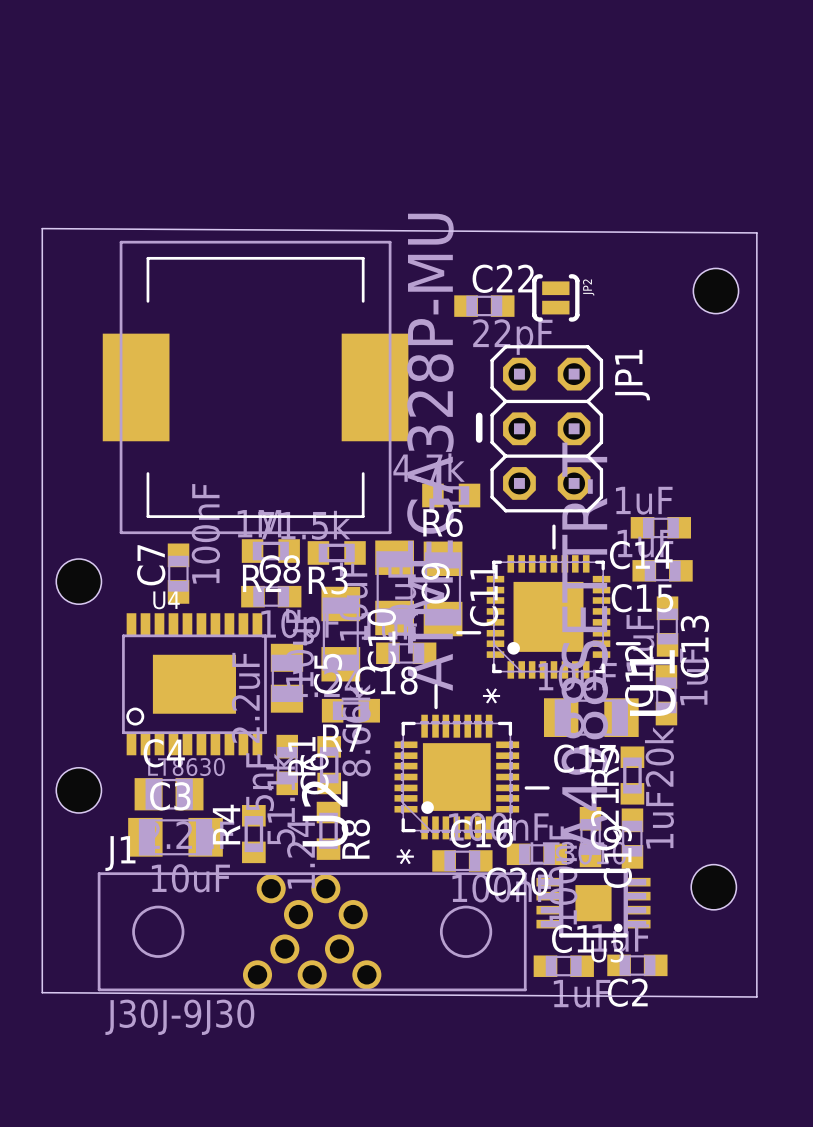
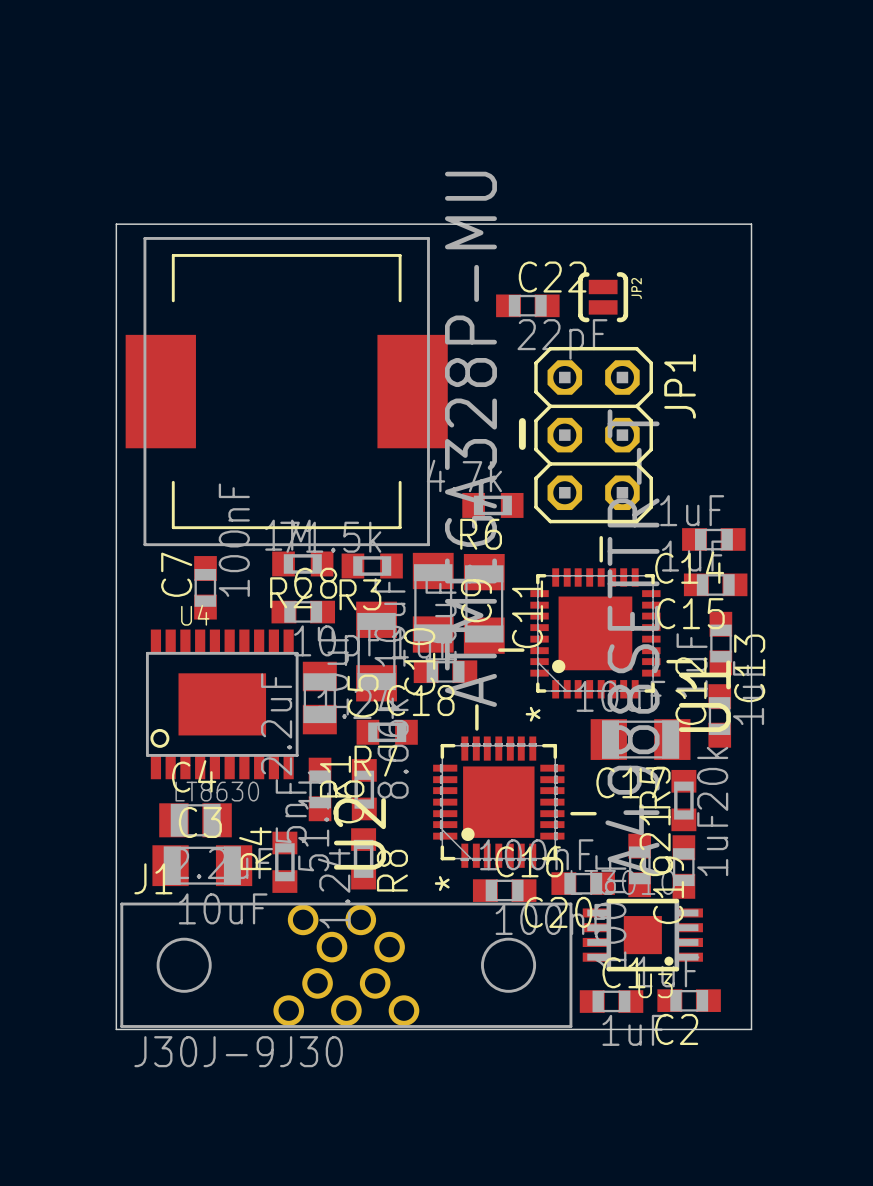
board edge: (42, 228) (756, 232) (756, 996) (42, 992) (42, 228) -> (116, 224) (116, 1029) (751, 1029) (751, 224) (116, 224)
hole: (715, 291) -> none
hole: (78, 581) -> none
hole: (78, 790) -> none
hole: (713, 887) -> none

